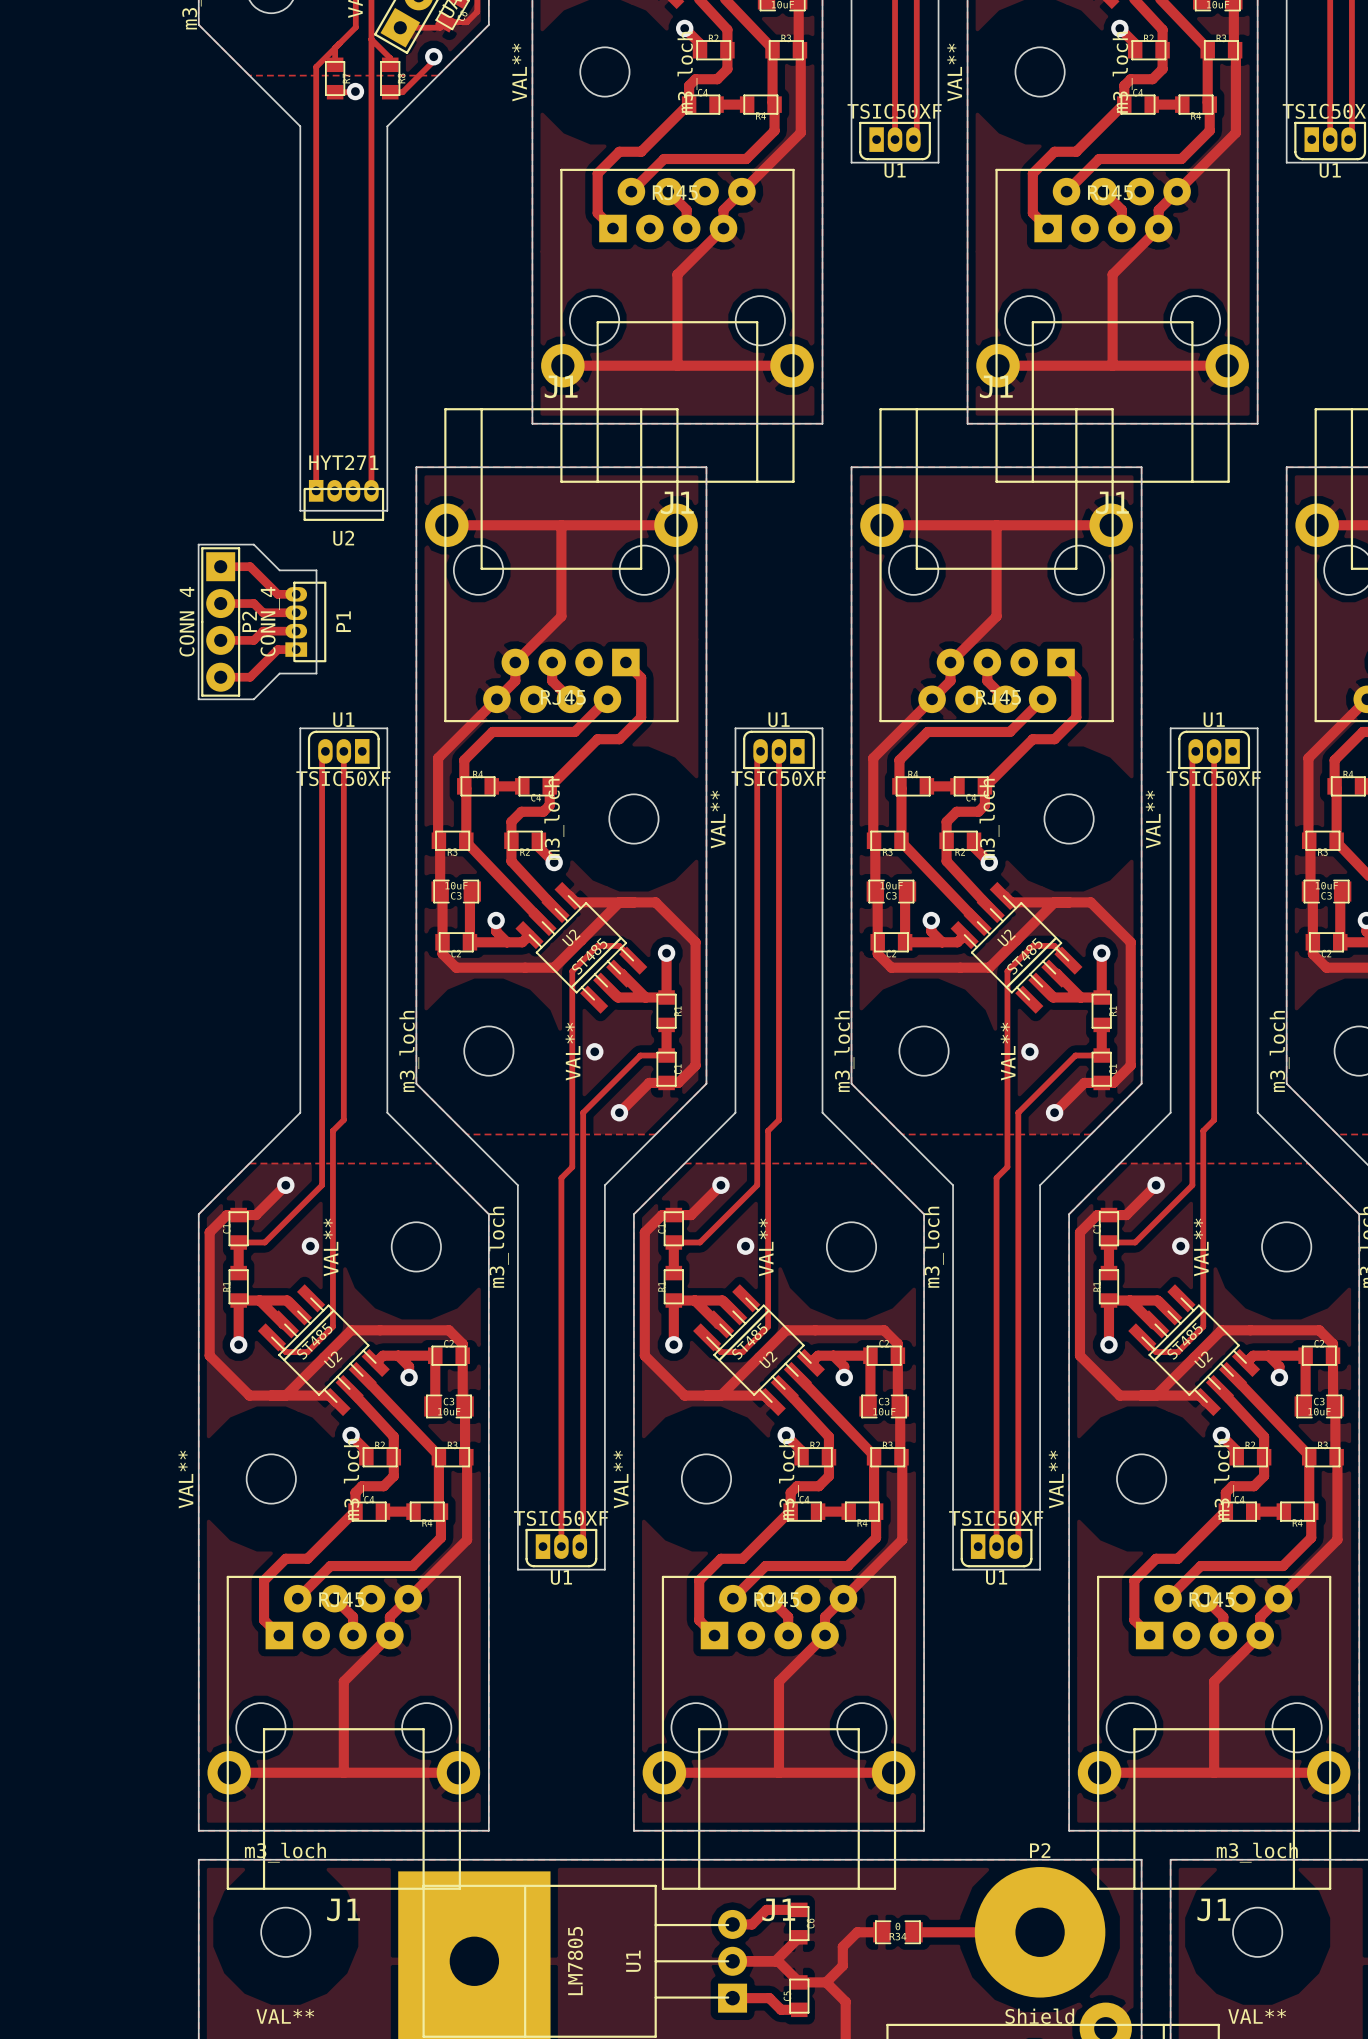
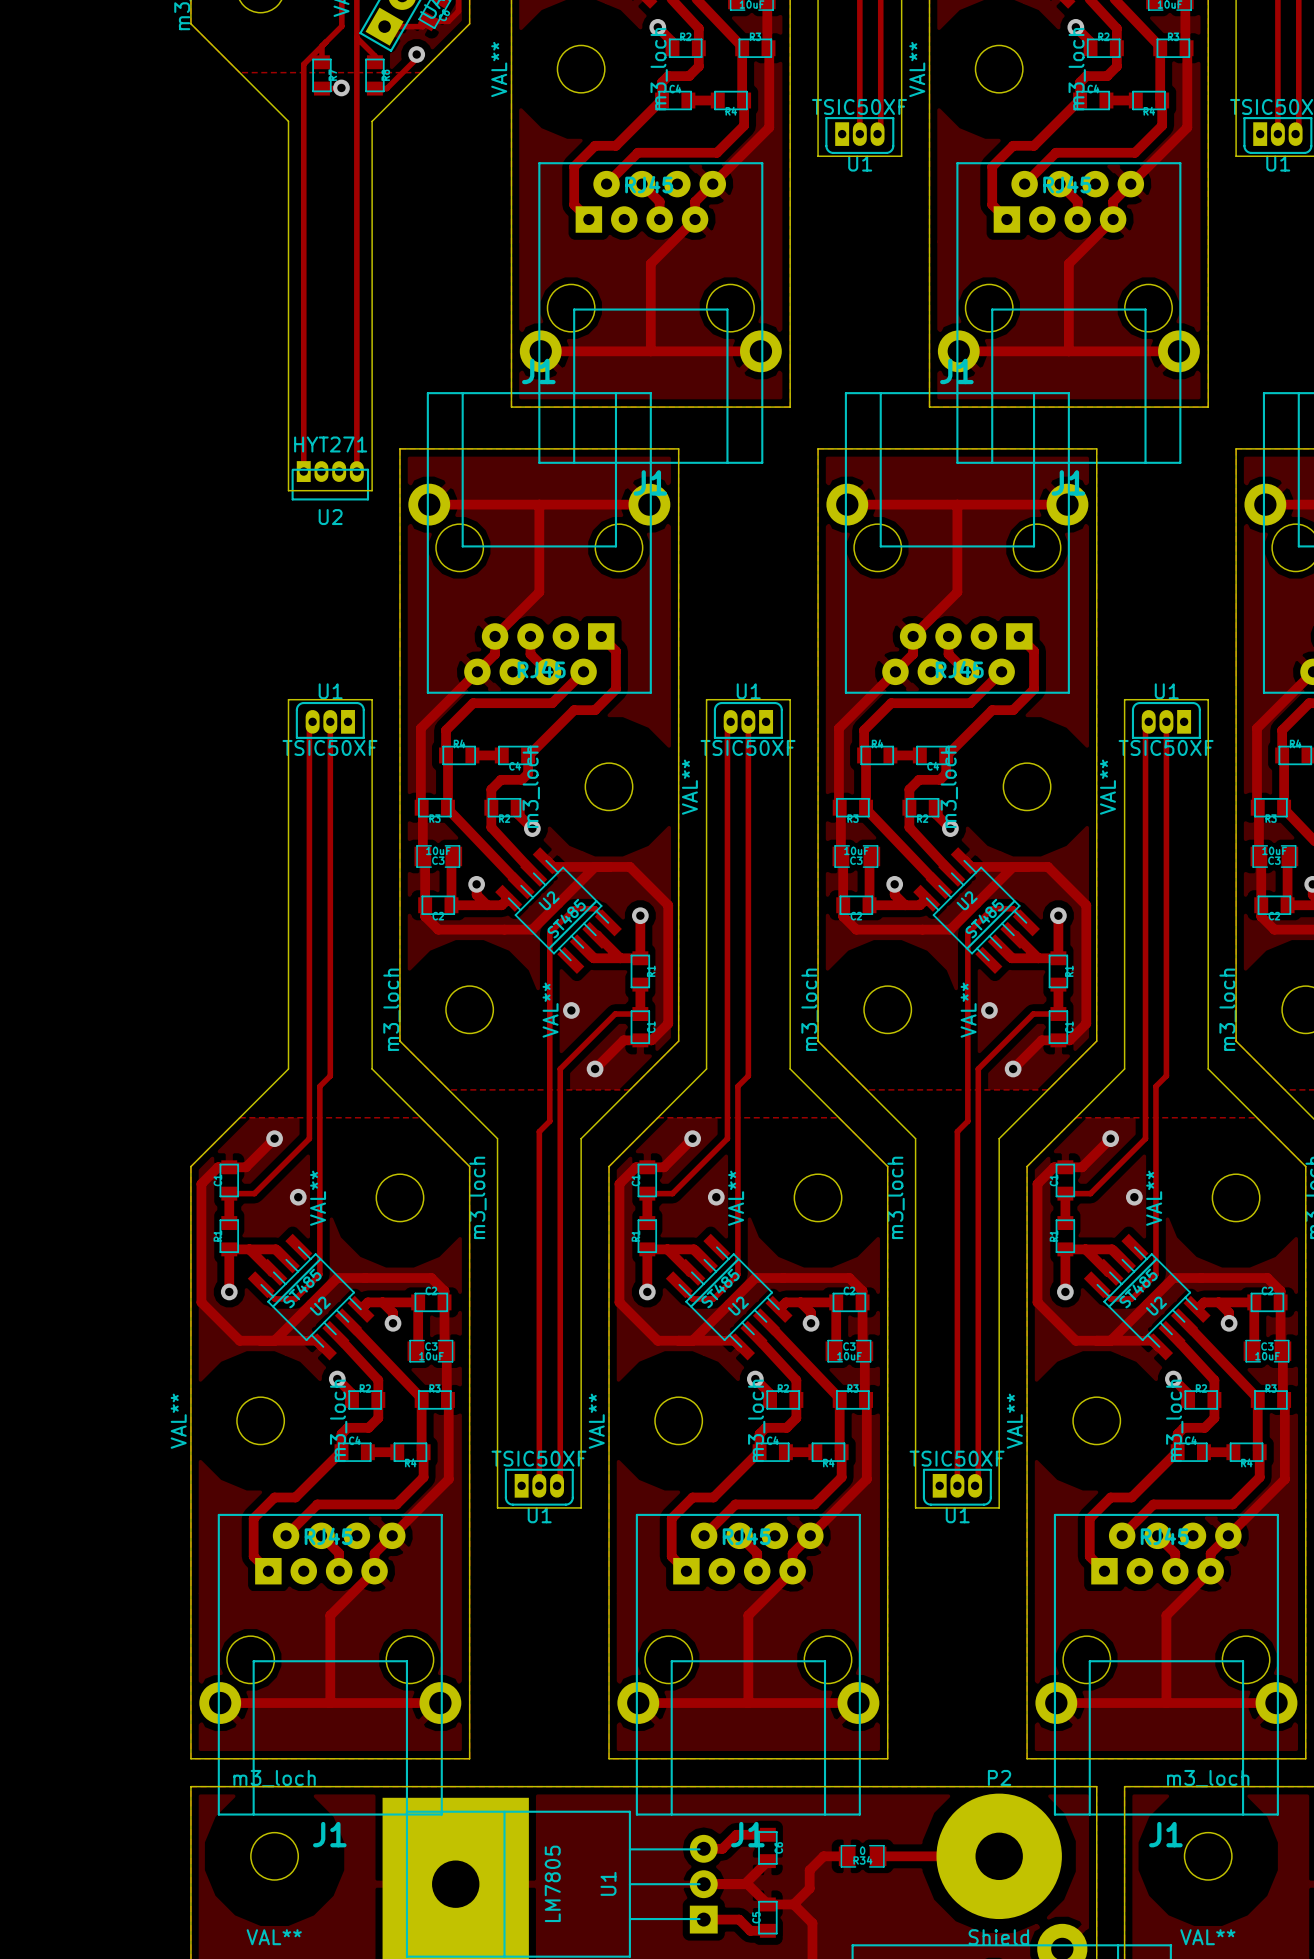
board edge: (198, 544) (253, 544) (279, 570) (316, 570) (316, 673) (279, 673) (253, 699) (198, 699) (198, 544) -> none
track: (220, 566) (250, 566) (277, 594) (296, 594) -> none
track: (220, 603) (253, 603) (263, 612) (296, 612) -> none
P2: CONN_4 (220, 621) -> none
P1: CONN_4 (305, 621) -> none
track: (296, 631) (263, 631) (253, 640) (220, 640) -> none
track: (296, 649) (277, 649) (250, 677) (220, 677) -> none

